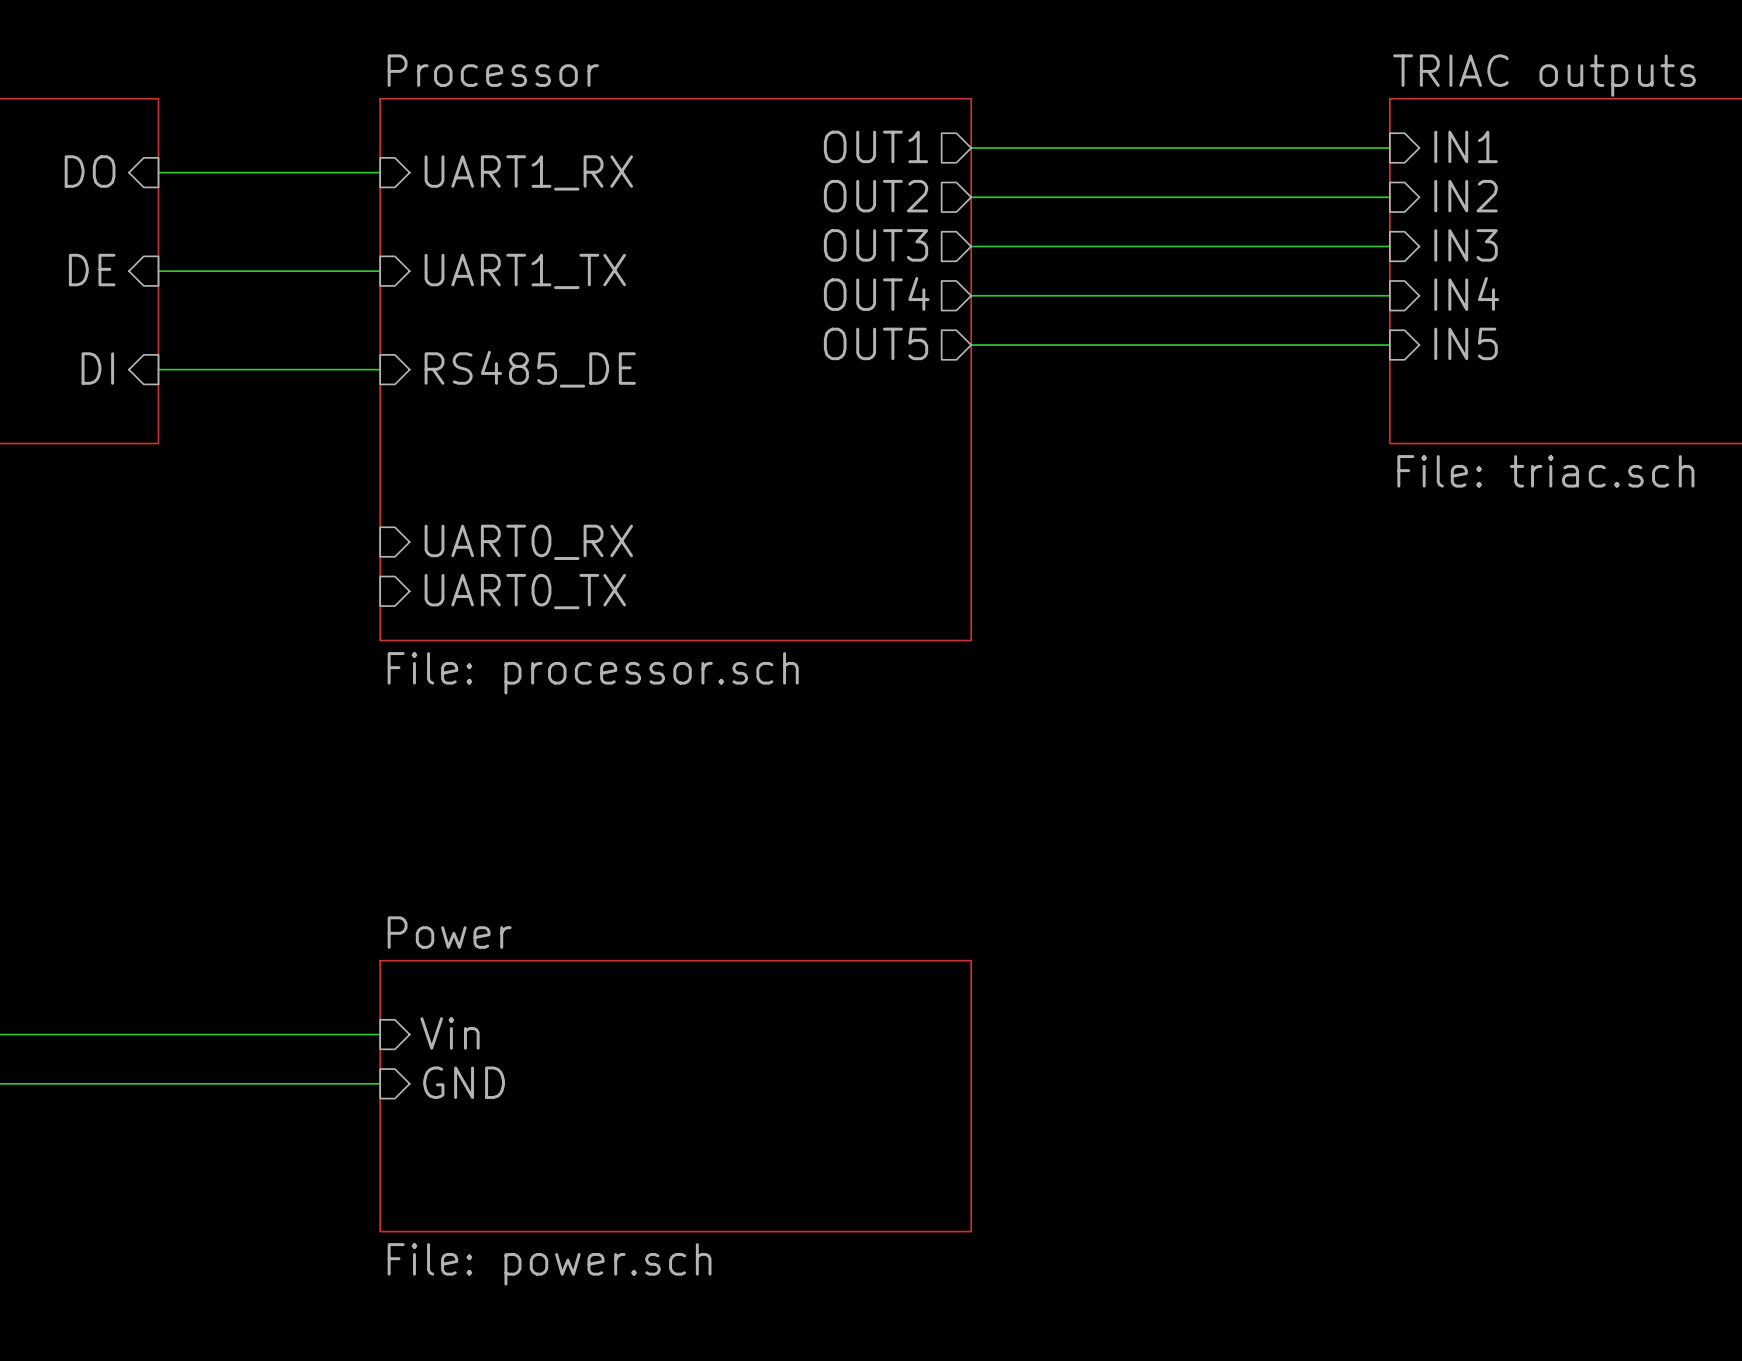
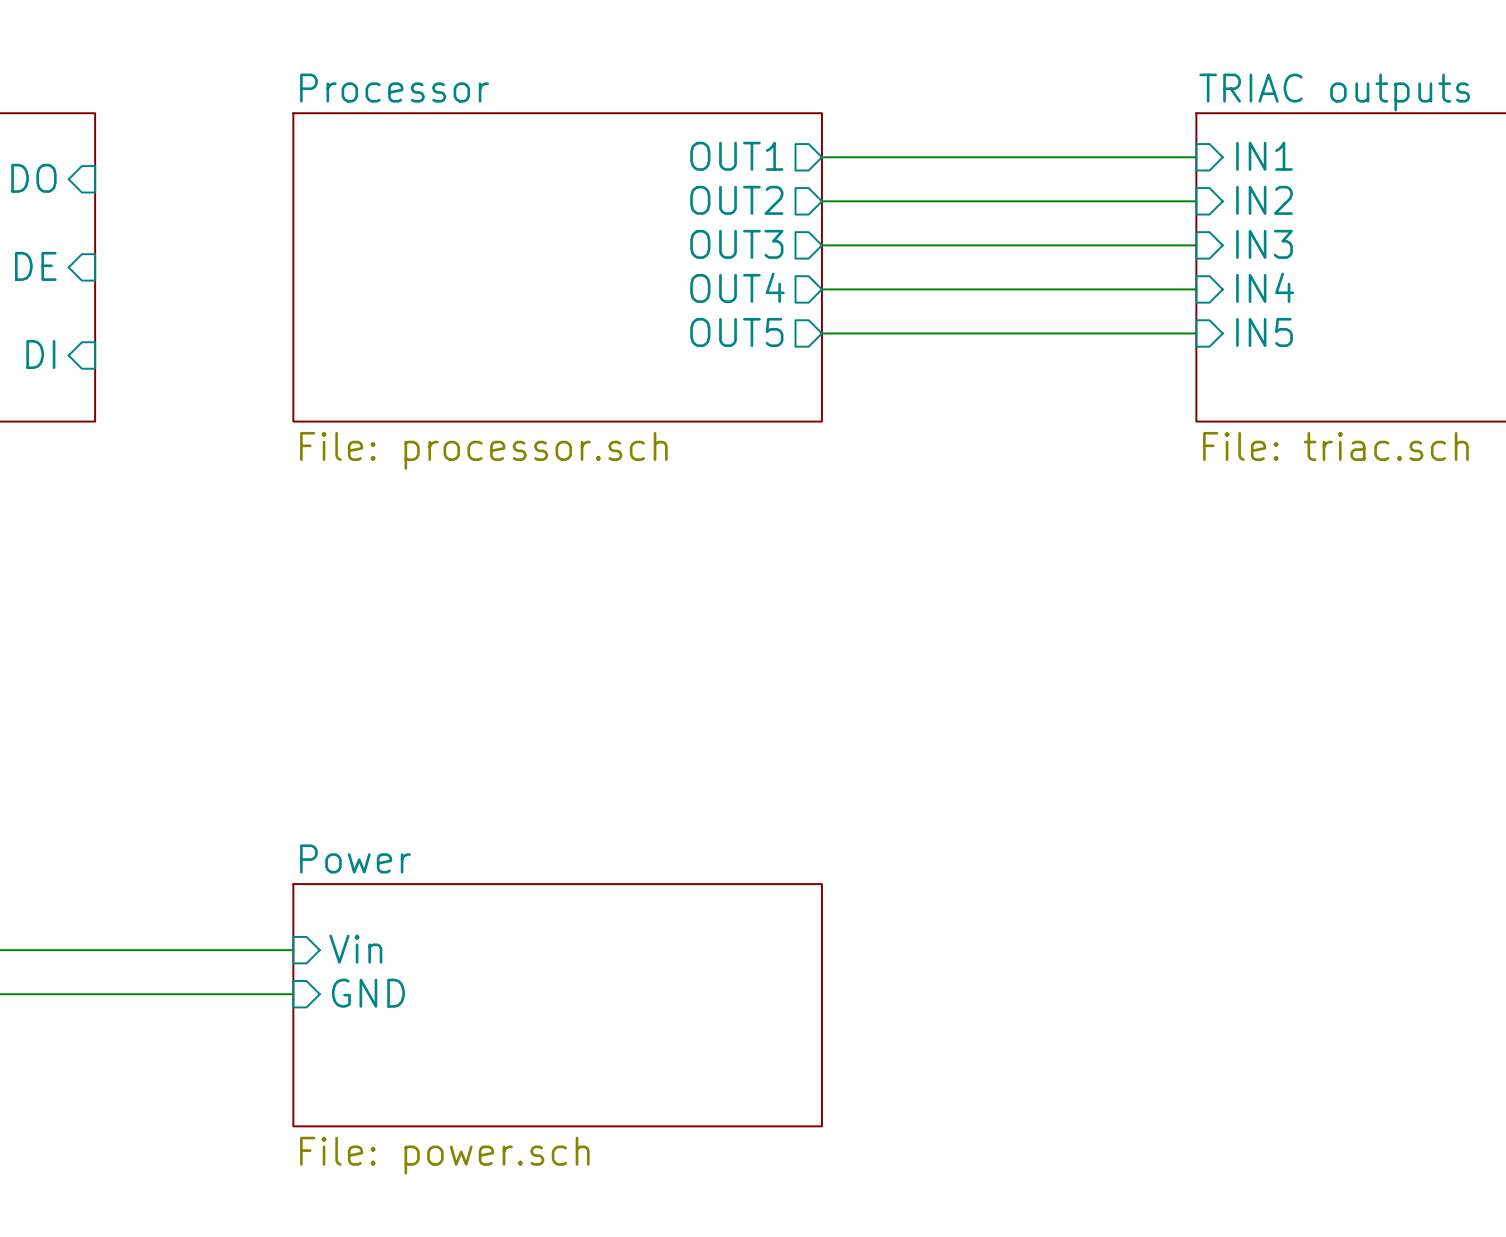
wire: (158, 172) (380, 172) -> none
sheet pin: UART1_RX (528, 172) -> none
wire: (158, 271) (380, 271) -> none
sheet pin: UART1_TX (525, 271) -> none
sheet Processor: none -> File: processor.sch (557, 267)
wire: (158, 369) (380, 369) -> none
sheet pin: RS485_DE (530, 369) -> none
sheet Processor: File: processor.sch (675, 369) -> none
sheet pin: UART0_RX (528, 542) -> none
sheet pin: UART0_TX (525, 591) -> none

